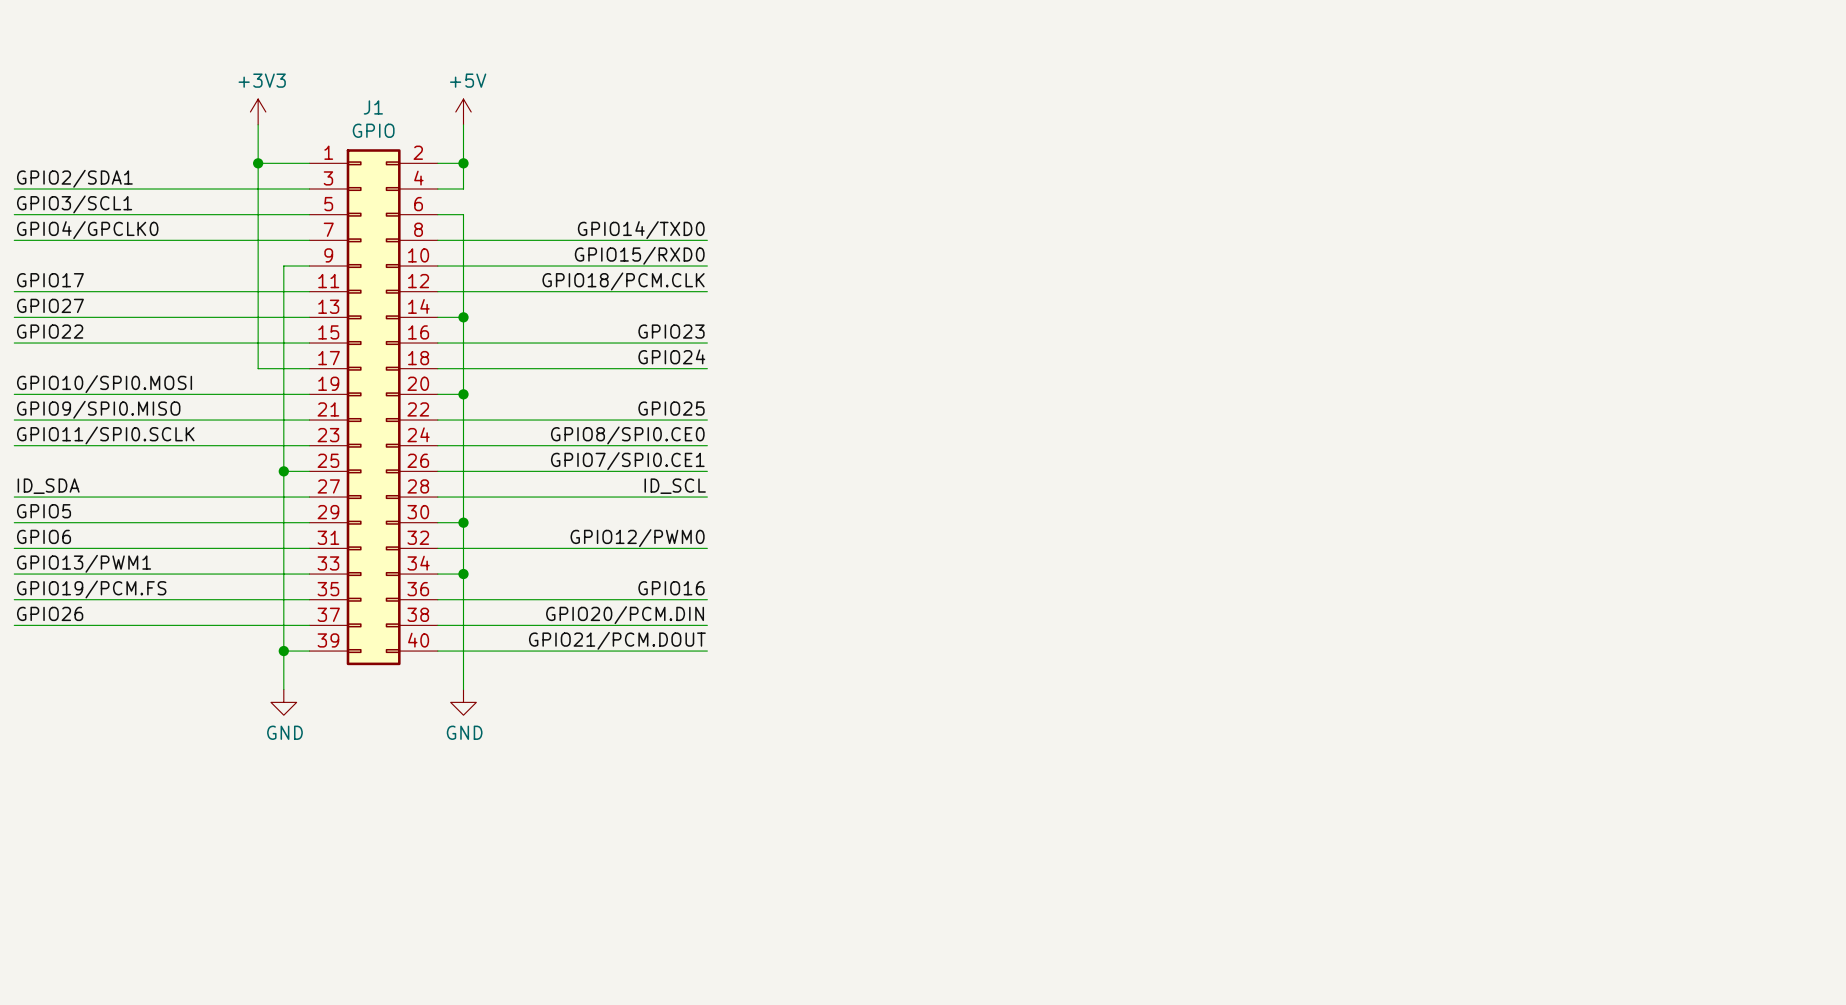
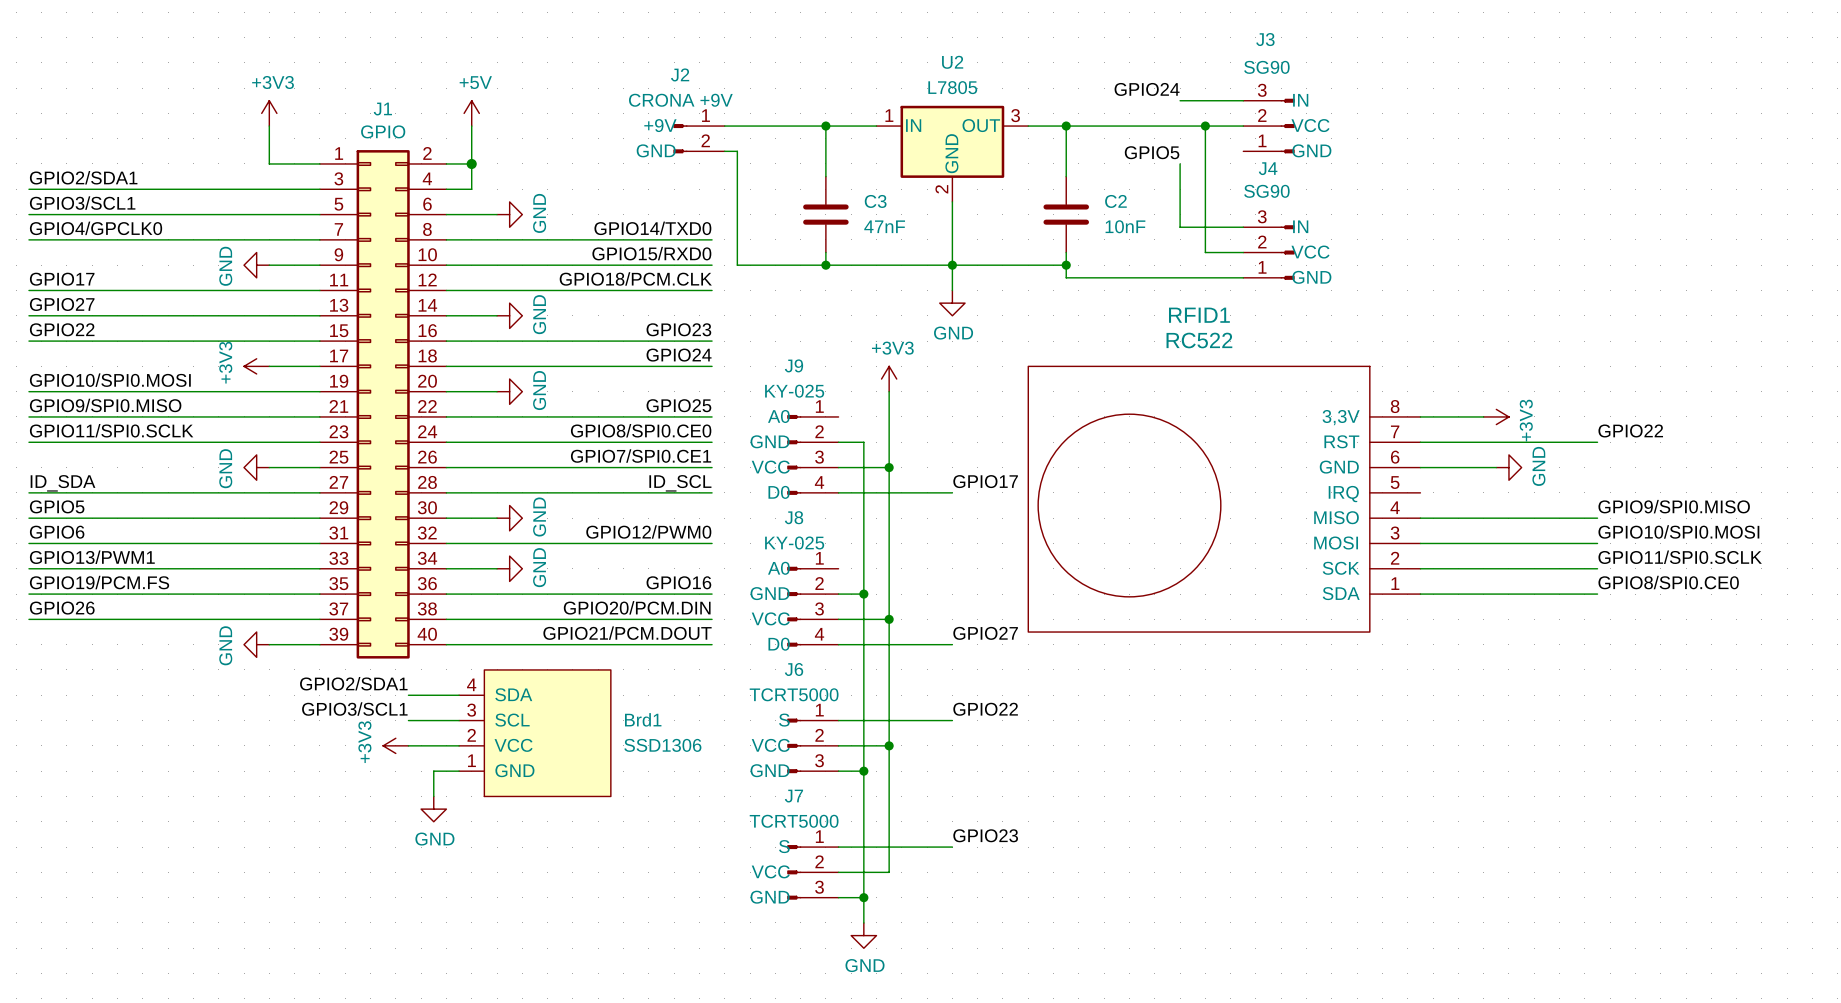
label: none -> GPIO24 (1147, 89)
wire: none -> (1180, 100) (1243, 100)
wire: none -> (724, 126) (876, 126)
wire: none -> (825, 126) (825, 176)
junction: none -> (825, 126)
wire: none -> (1028, 126) (1243, 126)
wire: none -> (1066, 126) (1066, 176)
junction: none -> (1066, 126)
wire: none -> (1205, 126) (1205, 252) (1243, 252)
junction: none -> (1205, 126)
J3: none -> SG90 (1269, 126)
J2: none -> CRONA +9V (699, 138)
wire: none -> (724, 151) (737, 151) (737, 265) (1066, 265)
label: none -> GPIO5 (1152, 152)
U2: none -> L7805 (952, 153)
wire: (258, 163) (258, 368) -> none
junction: (258, 163) -> none
wire: none -> (1180, 163) (1180, 227) (1243, 227)
wire: none -> (952, 201) (952, 290)
wire: (463, 214) (463, 689) -> (471, 214) (497, 214)
power symbol: none -> GND (509, 214)
C3: none -> 47nF (825, 214)
C2: none -> 10nF (1066, 214)
wire: none -> (825, 252) (825, 265)
wire: none -> (1066, 252) (1066, 277) (1243, 277)
J4: none -> SG90 (1269, 252)
power symbol: none -> GND (256, 265)
wire: (283, 266) (283, 689) -> (294, 265) (269, 265)
junction: none -> (825, 265)
junction: none -> (952, 265)
junction: none -> (1066, 265)
power symbol: none -> GND (952, 303)
wire: none -> (471, 315) (497, 315)
junction: (463, 317) -> none
power symbol: none -> GND (509, 315)
power symbol: none -> +3V3 (256, 366)
power symbol: none -> +3V3 (889, 379)
wire: none -> (471, 391) (497, 391)
junction: (463, 394) -> none
power symbol: none -> GND (509, 391)
wire: none -> (889, 391) (889, 872) (838, 872)
wire: none -> (1420, 416) (1483, 416)
power symbol: none -> +3V3 (1496, 416)
label: none -> GPIO22 (1630, 430)
wire: none -> (838, 442) (863, 442) (863, 922)
wire: none -> (1420, 442) (1597, 442)
J9: none -> KY-025 (812, 454)
power symbol: none -> GND (256, 467)
wire: none -> (269, 467) (294, 467)
junction: (283, 471) -> none
wire: none -> (838, 467) (889, 467)
junction: none -> (889, 467)
wire: none -> (1420, 467) (1496, 467)
power symbol: none -> GND (1508, 467)
label: none -> GPIO17 (985, 481)
wire: none -> (838, 492) (952, 492)
RFID1: none -> RC522 (1224, 499)
label: none -> GPIO9/SPI0.MISO (1674, 506)
wire: none -> (471, 518) (497, 518)
junction: (463, 522) -> none
power symbol: none -> GND (509, 518)
wire: none -> (1420, 518) (1597, 518)
label: none -> GPIO10/SPI0.MOSI (1678, 531)
wire: none -> (1420, 543) (1597, 543)
label: none -> GPIO11/SPI0.SCLK (1680, 557)
wire: none -> (471, 568) (497, 568)
junction: (463, 574) -> none
power symbol: none -> GND (509, 568)
wire: none -> (1420, 568) (1597, 568)
label: none -> GPIO8/SPI0.CE0 (1668, 582)
wire: none -> (838, 594) (863, 594)
junction: none -> (863, 594)
wire: none -> (1420, 594) (1597, 594)
J8: none -> KY-025 (812, 606)
wire: none -> (838, 619) (889, 619)
junction: none -> (889, 619)
label: none -> GPIO27 (985, 633)
wire: none -> (269, 644) (294, 644)
junction: (283, 651) -> none
wire: none -> (838, 644) (952, 644)
label: none -> GPIO2/SDA1 (353, 683)
power symbol rotation: 0° (283, 702) -> 90° clockwise (256, 644)
power symbol position: GND (283, 702) -> GND (256, 644)
wire: none -> (408, 695) (459, 695)
power symbol: GND (463, 702) -> none
label: none -> GPIO22 (985, 709)
label: none -> GPIO3/SCL1 (354, 709)
wire: none -> (408, 720) (459, 720)
wire: none -> (838, 720) (952, 720)
Brd1: none -> SSD1306 (534, 733)
power symbol: none -> +3V3 (395, 745)
wire: none -> (408, 745) (459, 745)
J6: none -> TCRT5000 (812, 745)
wire: none -> (838, 745) (889, 745)
junction: none -> (889, 745)
wire: none -> (459, 771) (433, 771) (433, 796)
wire: none -> (838, 771) (863, 771)
junction: none -> (863, 771)
power symbol: none -> GND (433, 809)
label: none -> GPIO23 (985, 835)
wire: none -> (838, 847) (952, 847)
J7: none -> TCRT5000 (812, 872)
wire: none -> (838, 897) (863, 897)
junction: none -> (863, 897)
power symbol: none -> GND (863, 935)

